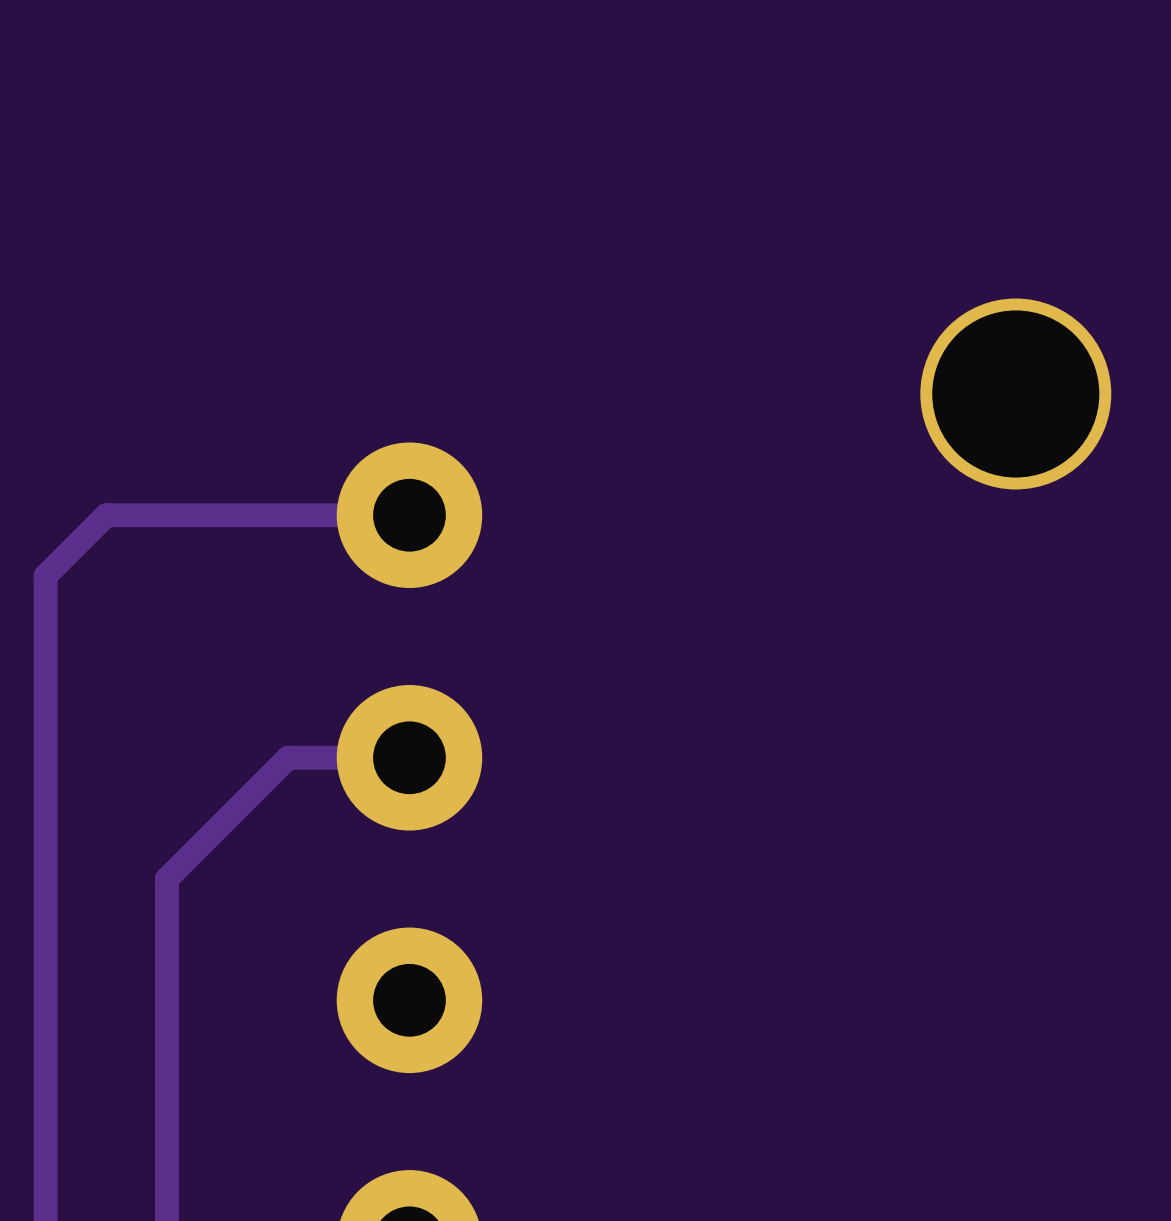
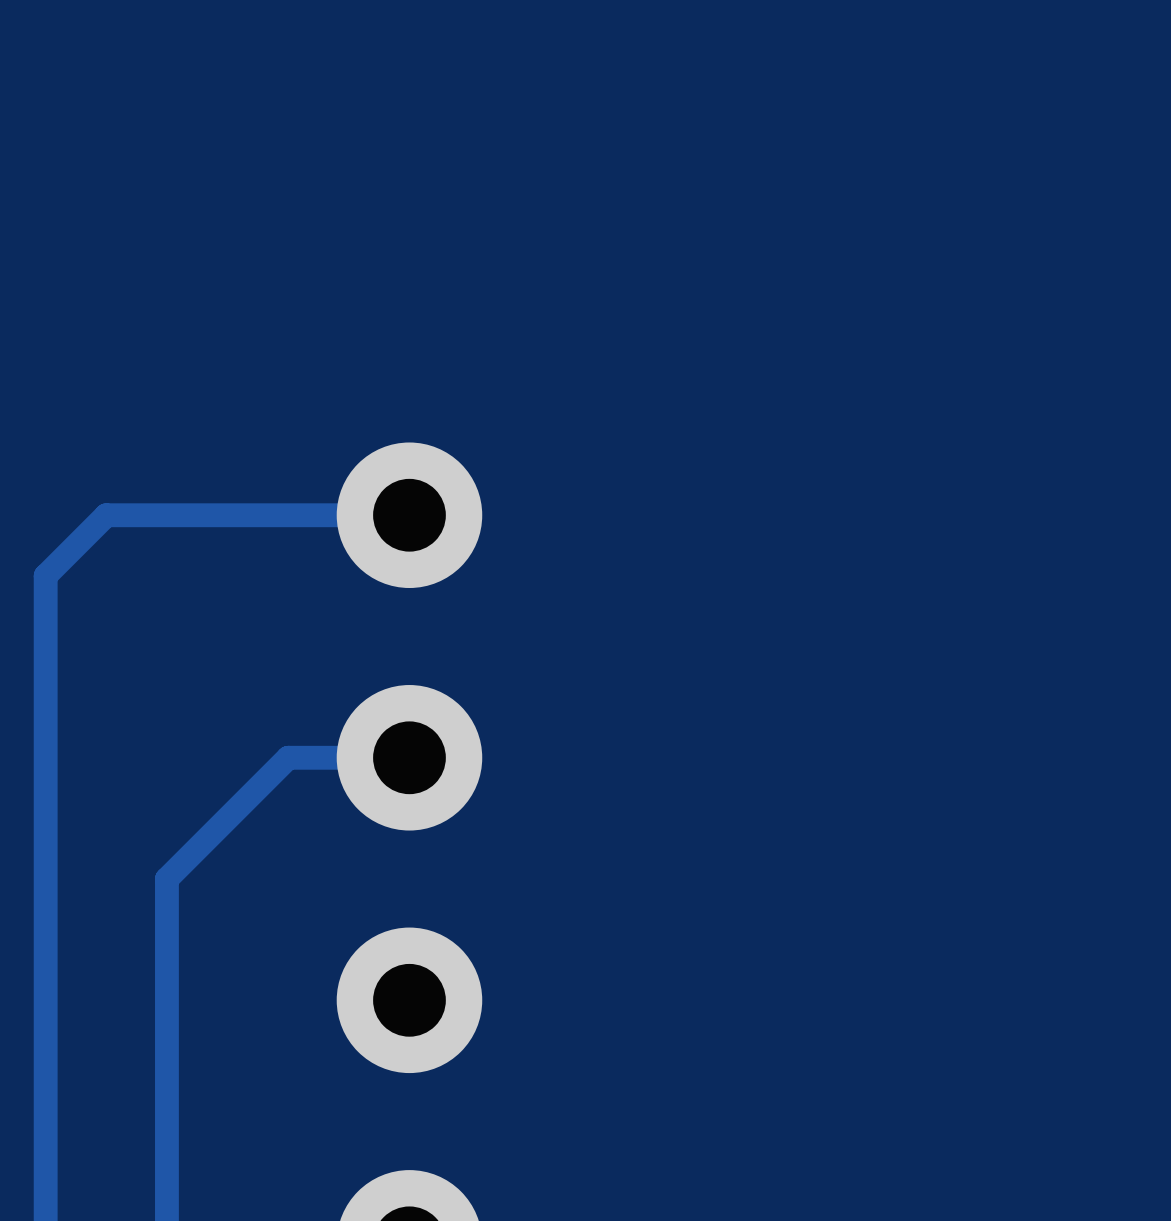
part: (1015, 393) -> none

